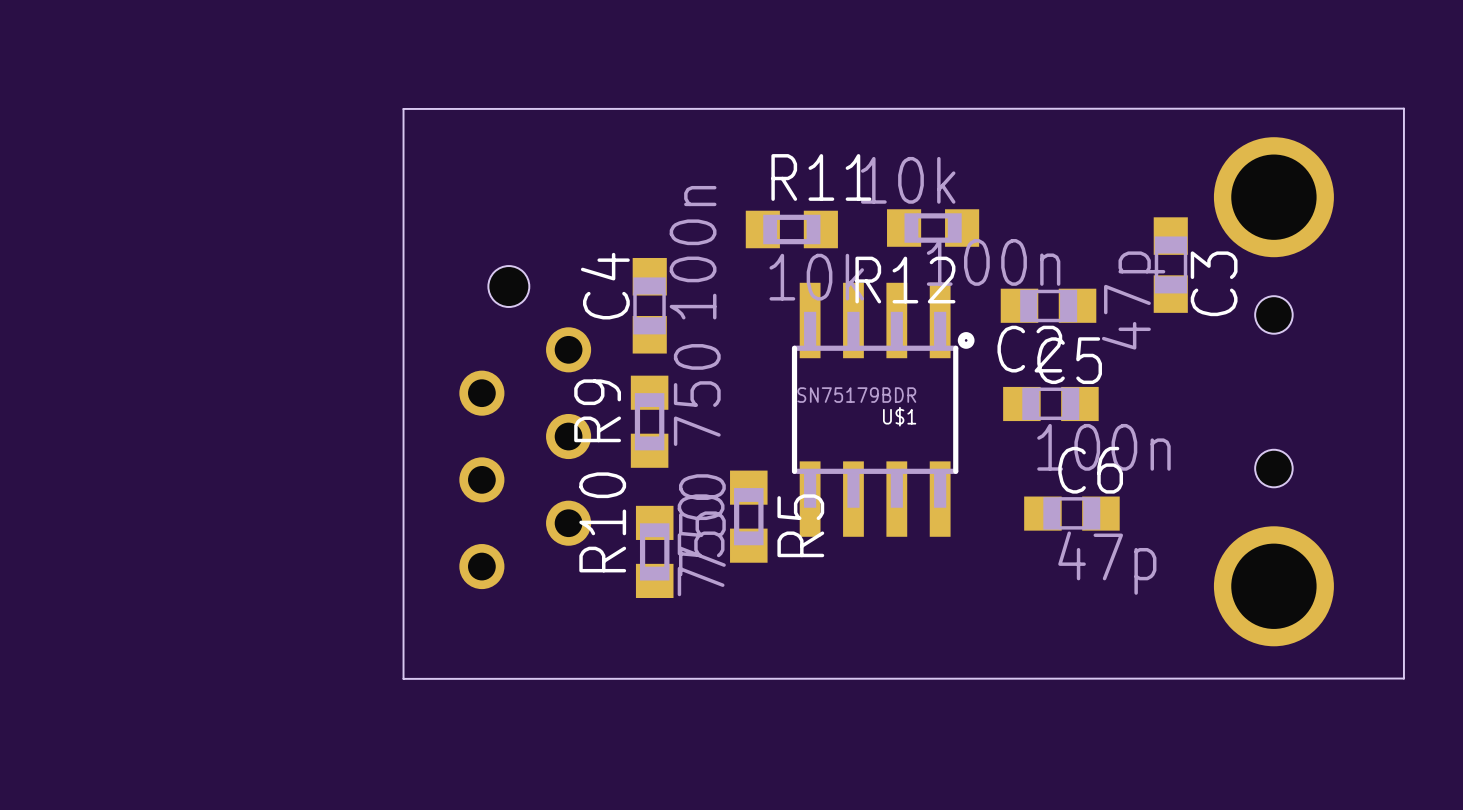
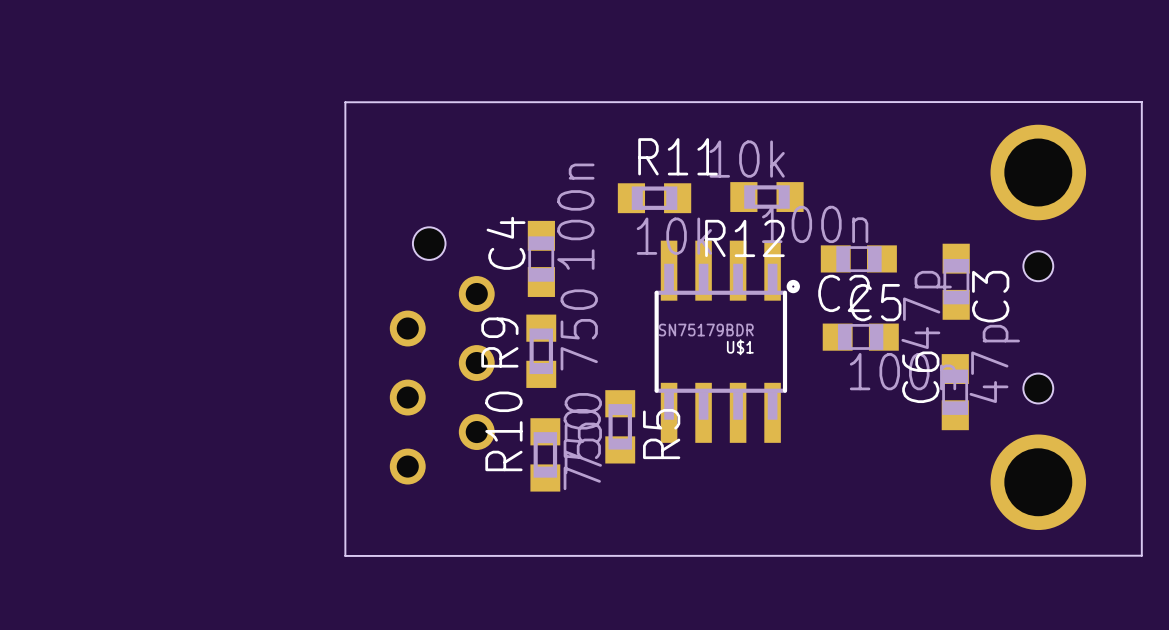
C3 position: (1170, 265) -> (956, 281)
C6 name position: C6 (1090, 470) -> C6 (920, 377)
C6 rotation: 0° (1071, 513) -> 90° clockwise (955, 392)
C6 position: (1071, 513) -> (955, 392)
C6 value position: 47p (1107, 563) -> 47p (994, 363)

